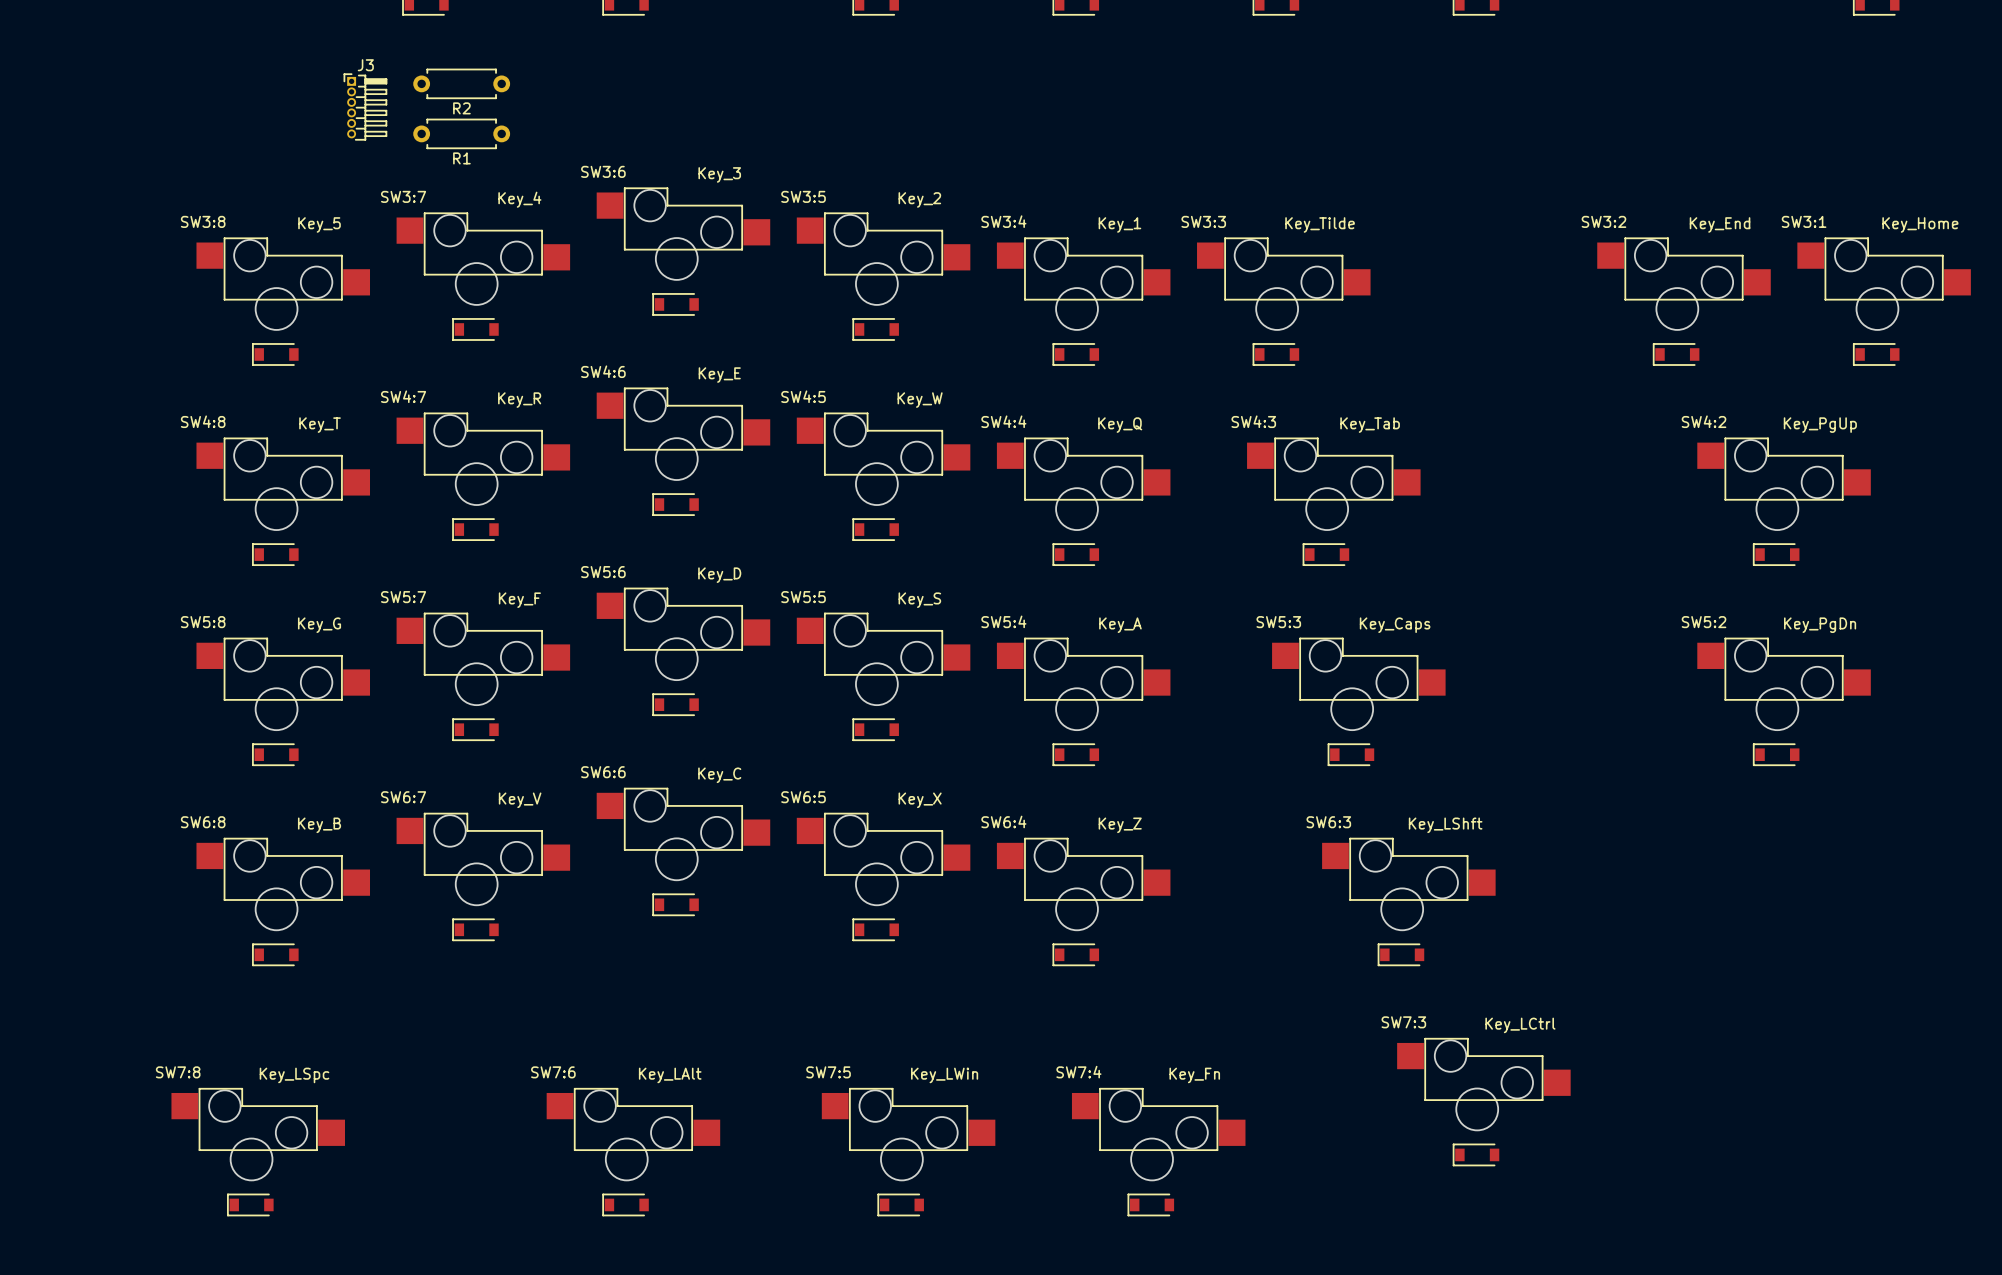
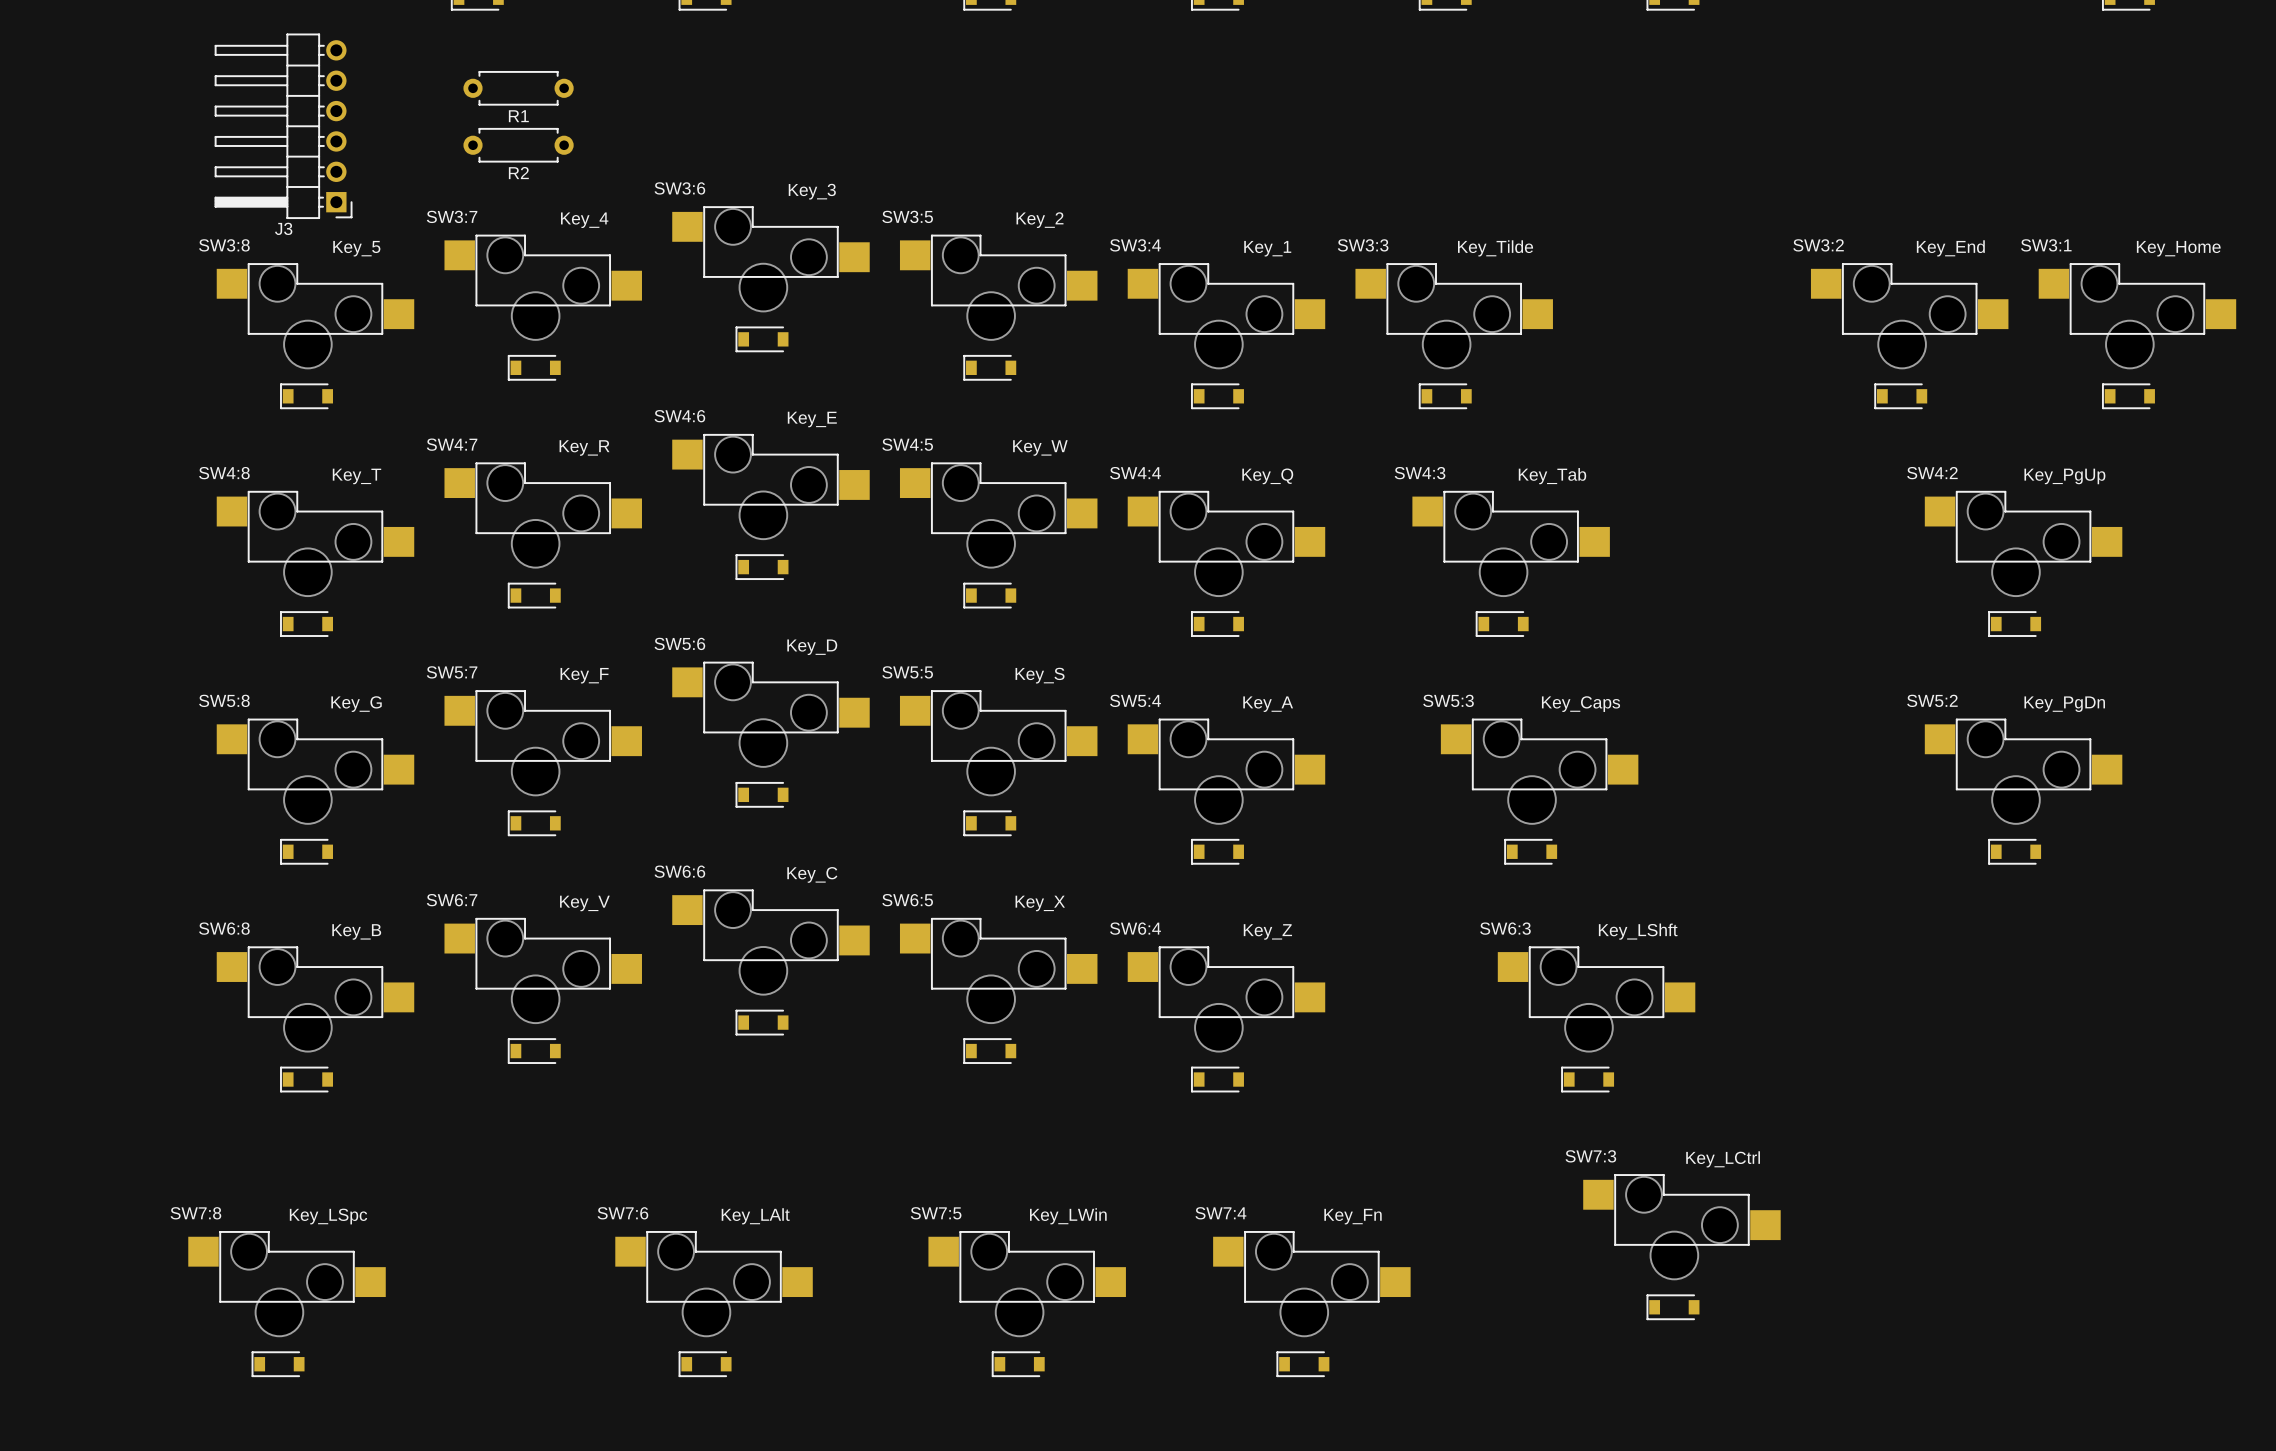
J3 name position: J3 (365, 65) -> J3 (283, 228)
J3 footprint: [343, 73, 388, 141] -> [214, 33, 353, 219]
R2 name: R2 (461, 108) -> R1 (518, 116)
R1 name: R1 (461, 158) -> R2 (518, 173)

